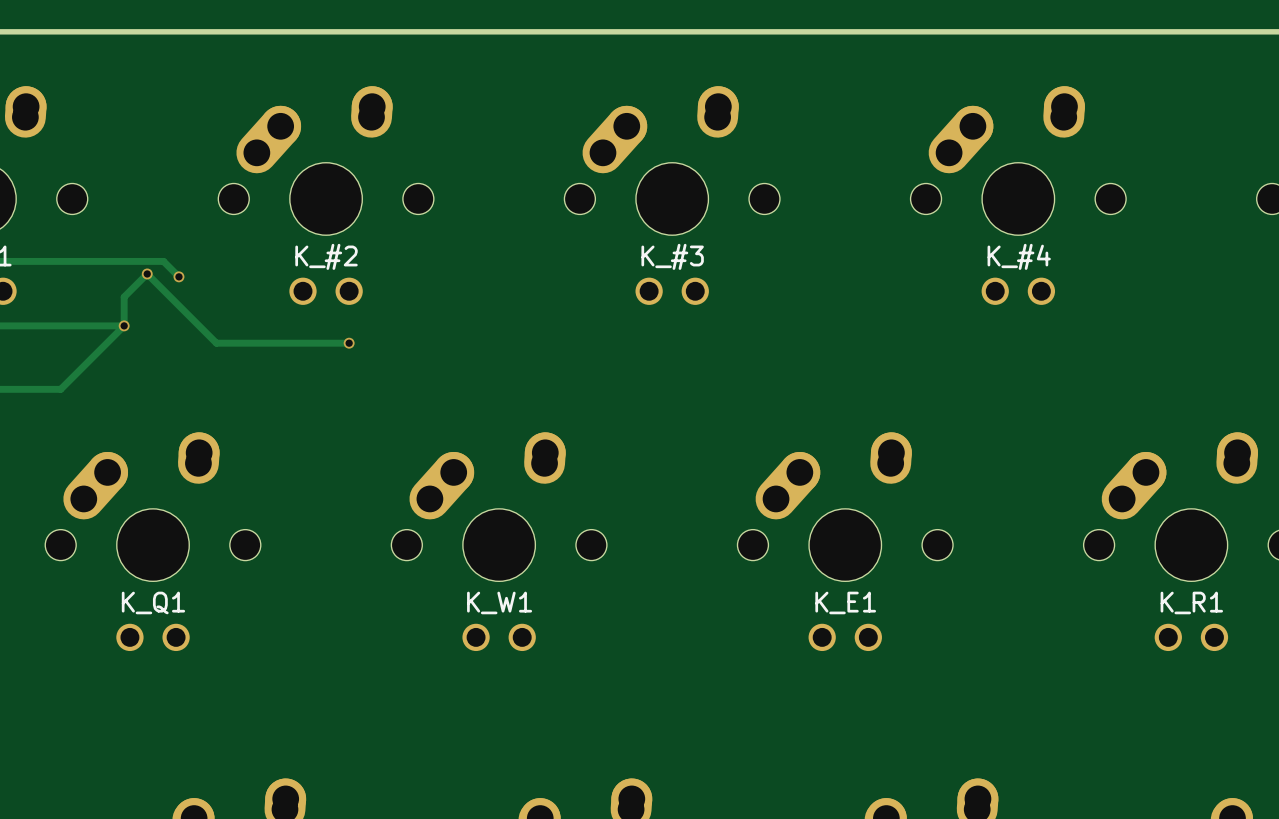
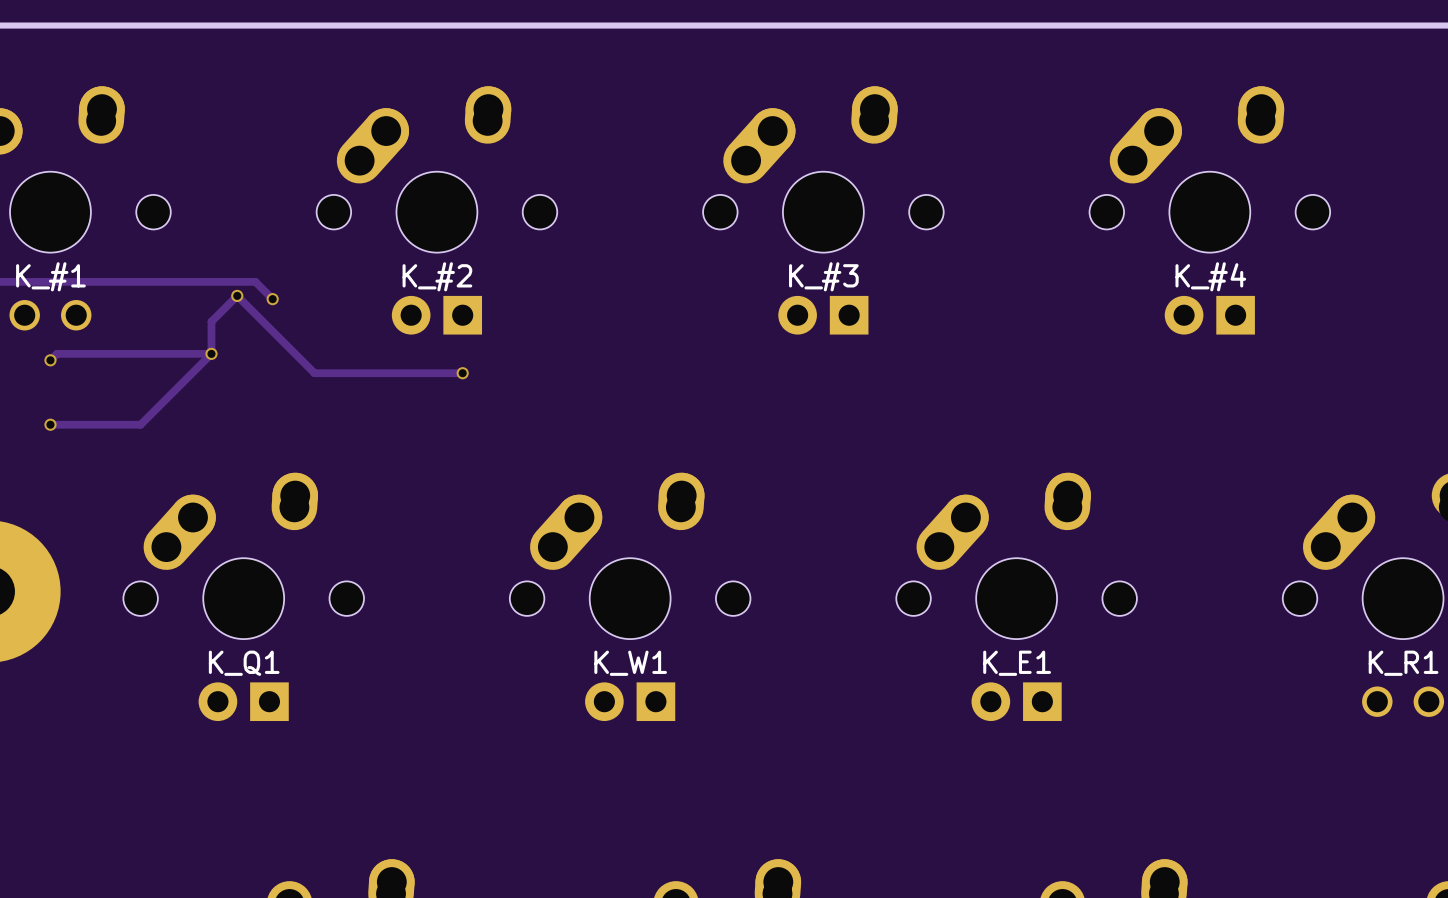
K_#2 footprint: [218, 86, 434, 305] -> [316, 86, 558, 335]
K_#3 footprint: [564, 86, 780, 305] -> [703, 86, 944, 335]
K_#4 footprint: [910, 86, 1127, 305] -> [1089, 86, 1331, 335]
K_Q1 footprint: [45, 432, 261, 652] -> [123, 472, 365, 722]
K_W1 footprint: [391, 432, 607, 652] -> [509, 472, 751, 722]
K_E1 footprint: [737, 432, 954, 652] -> [896, 472, 1137, 722]

